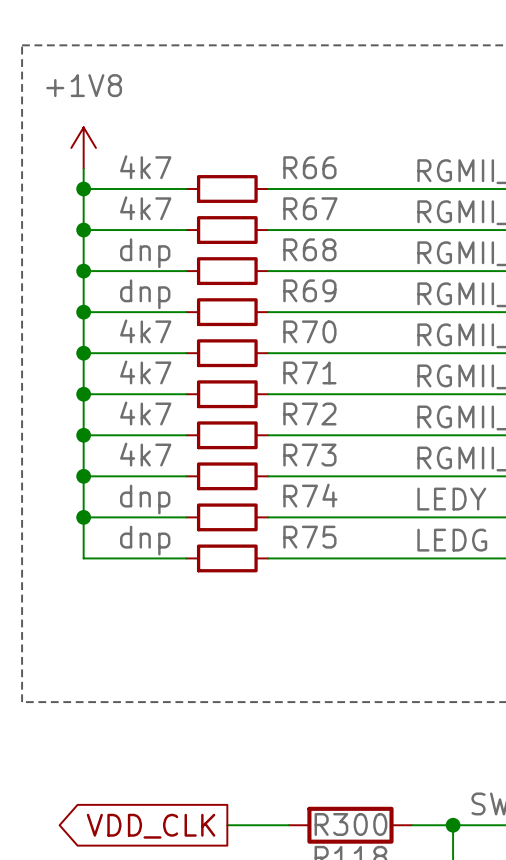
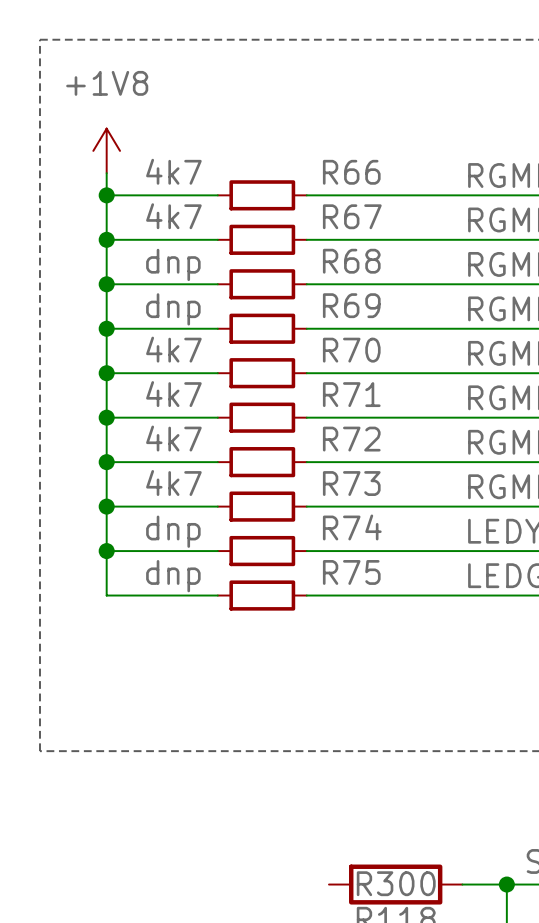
wire: (227, 825) (288, 825) -> none
global label: VDD_CLK (151, 826) -> none

